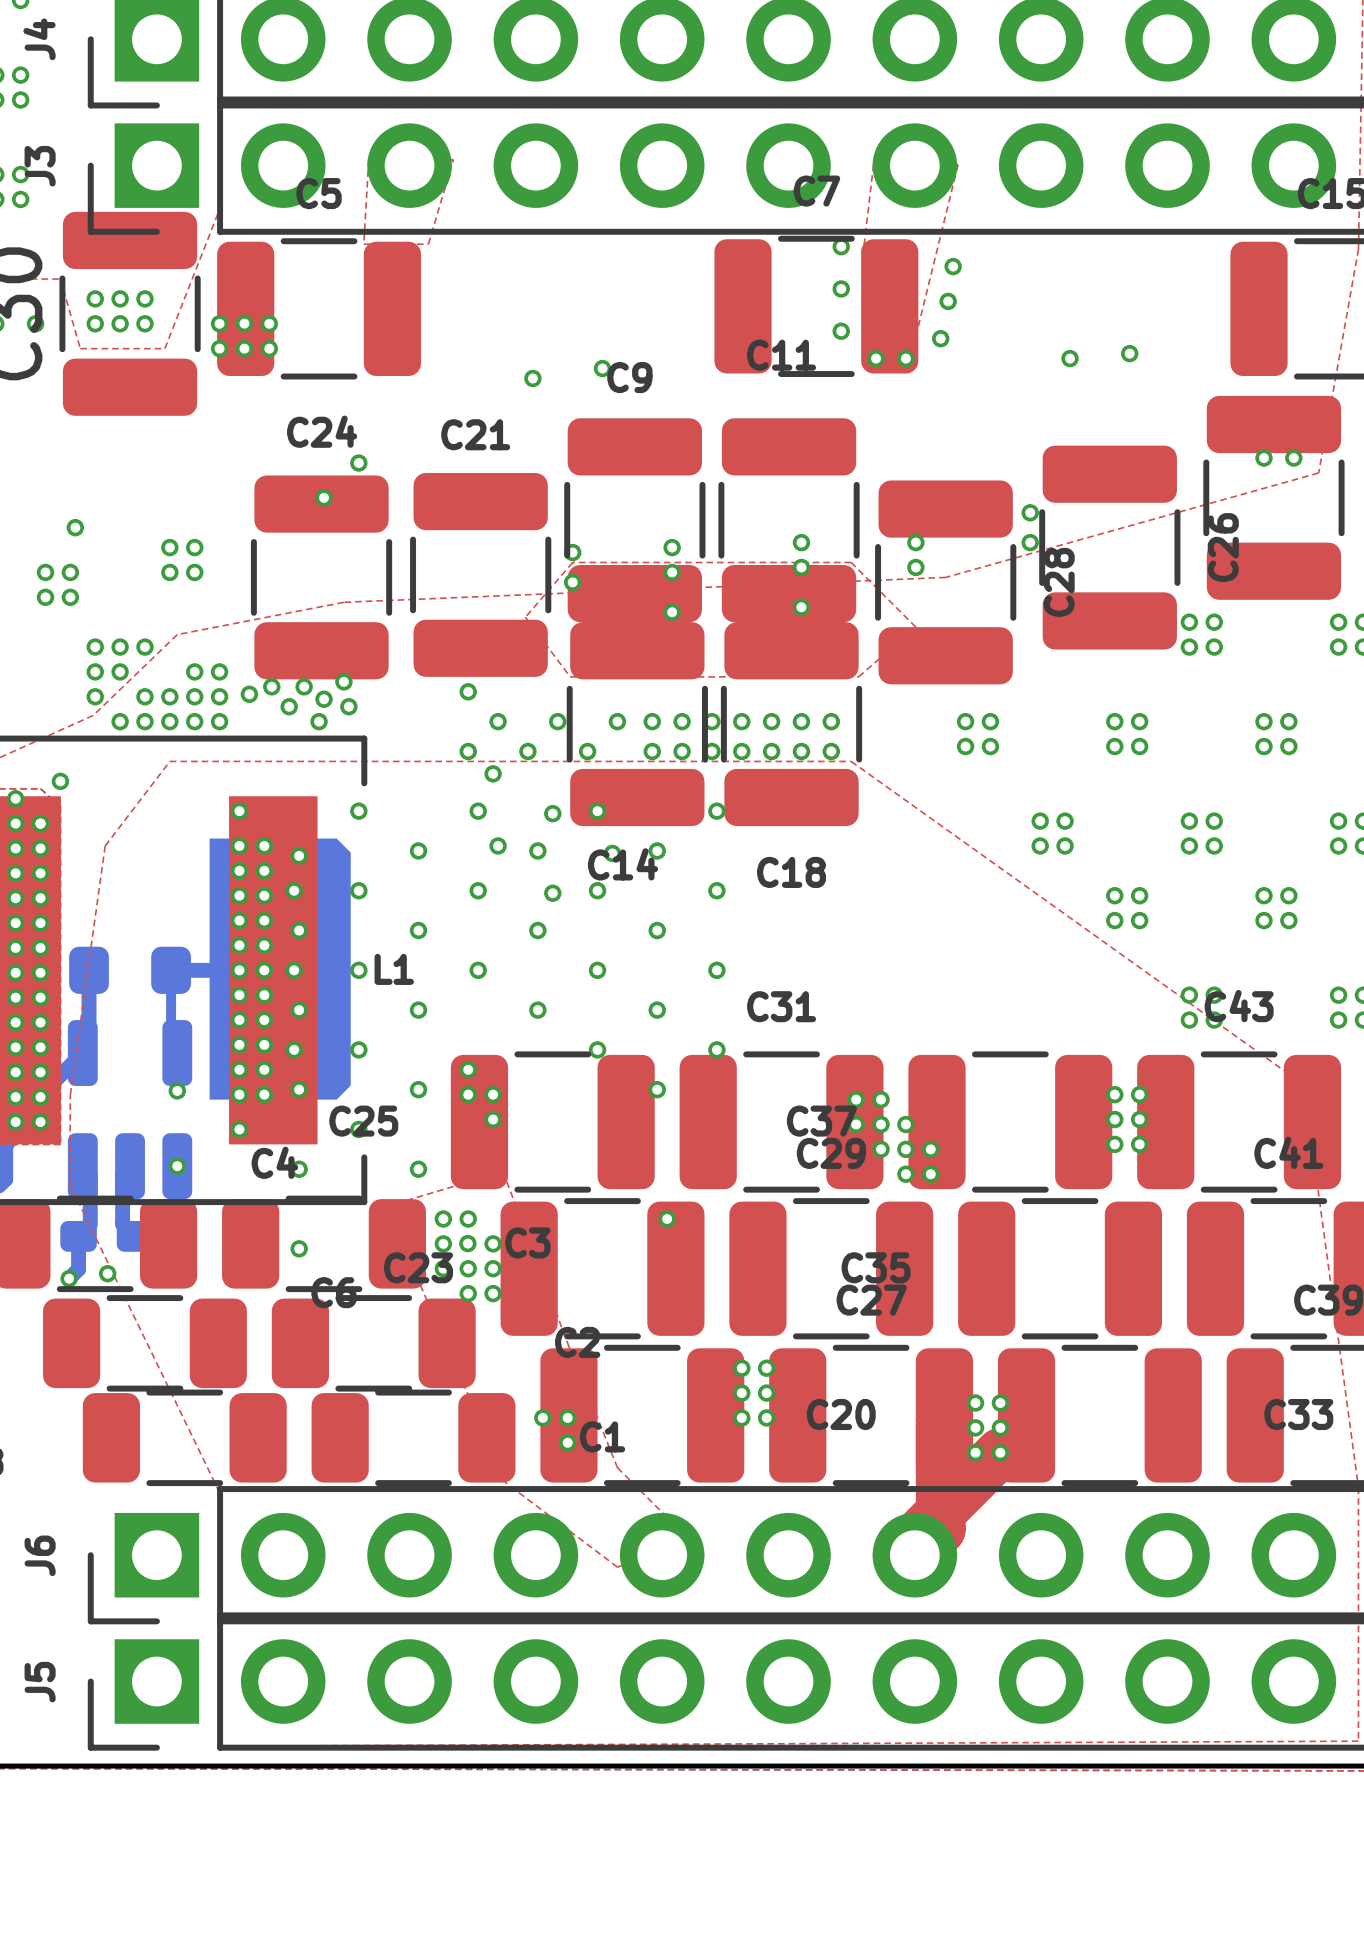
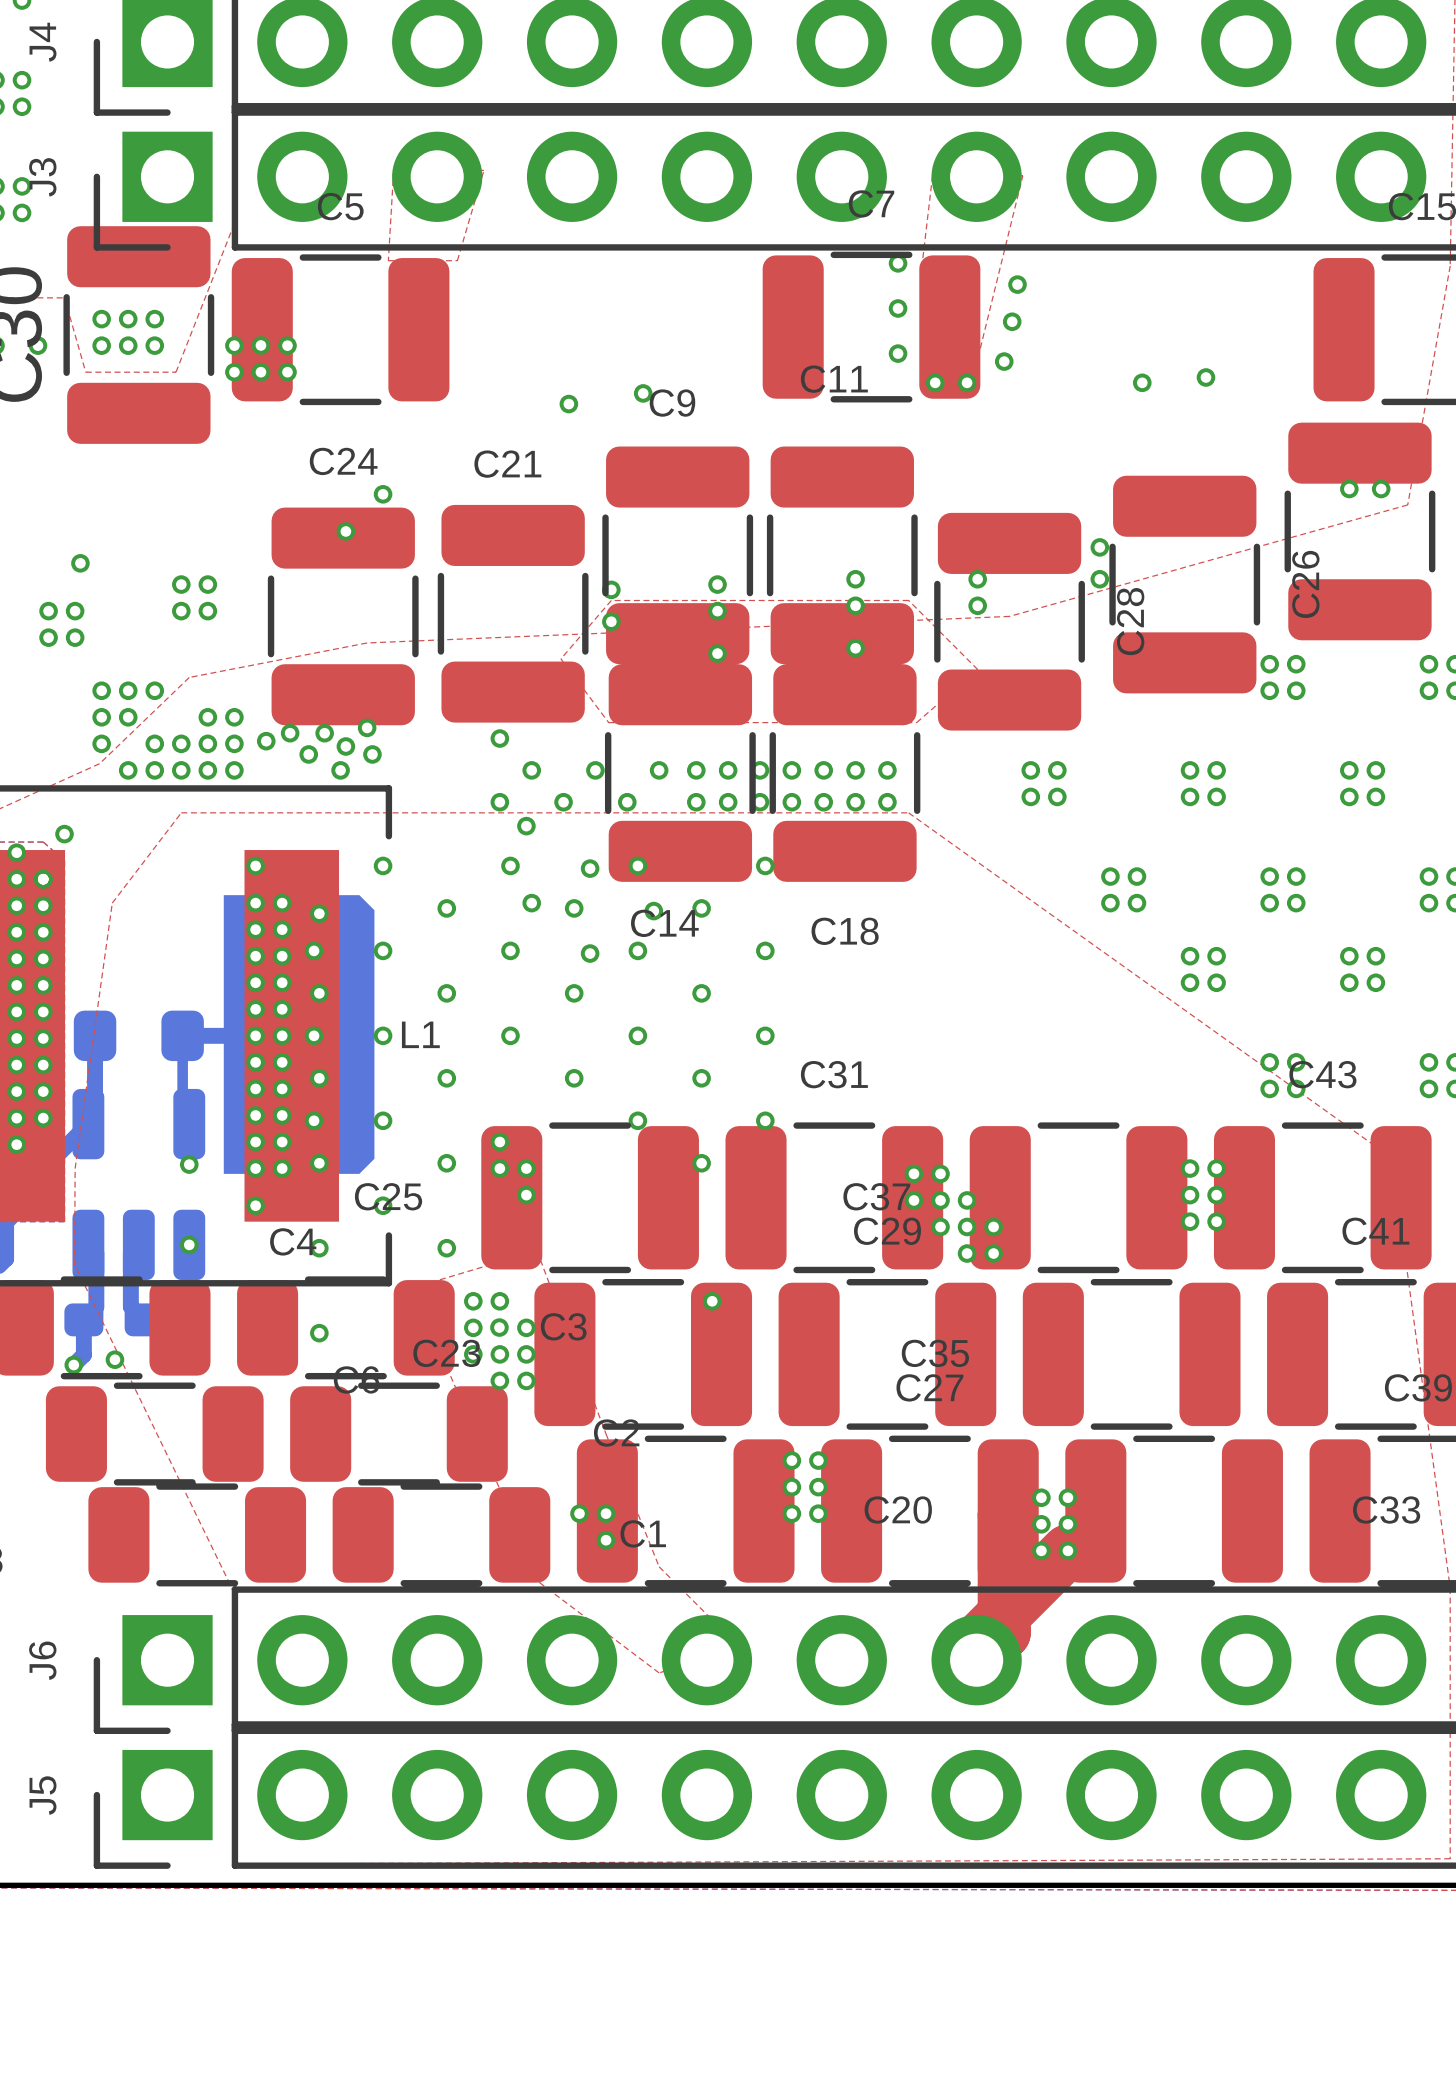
via: (40, 1072) -> none
via: (15, 1097) -> none
via: (40, 1097) -> none
via: (15, 1122) -> none
via: (40, 1122) -> none

